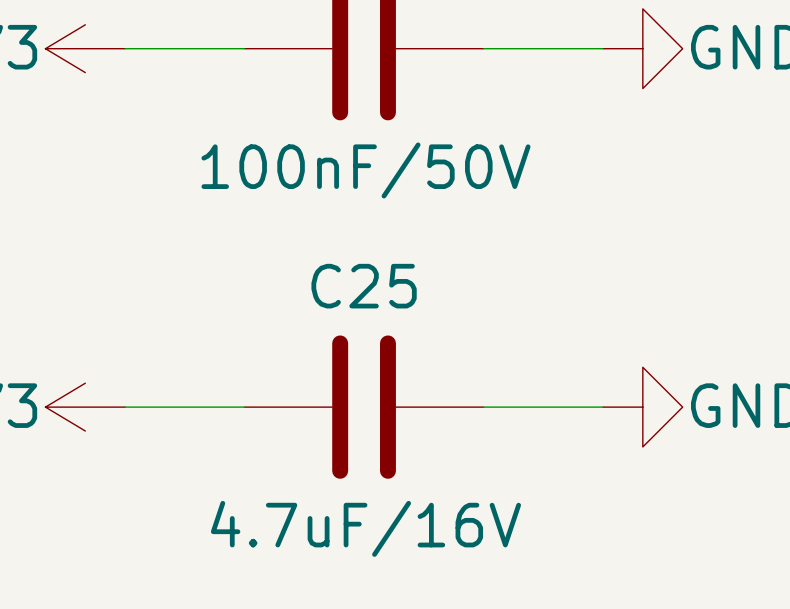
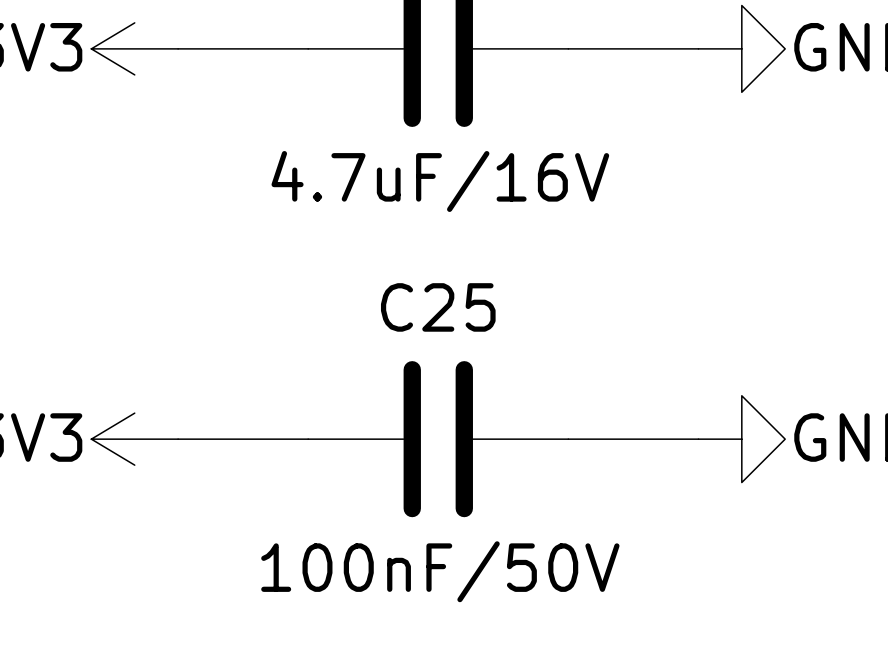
part value: 100nF/50V (365, 170) -> 4.7uF/16V (440, 181)
C25 value: 4.7uF/16V (365, 528) -> 100nF/50V (440, 571)

